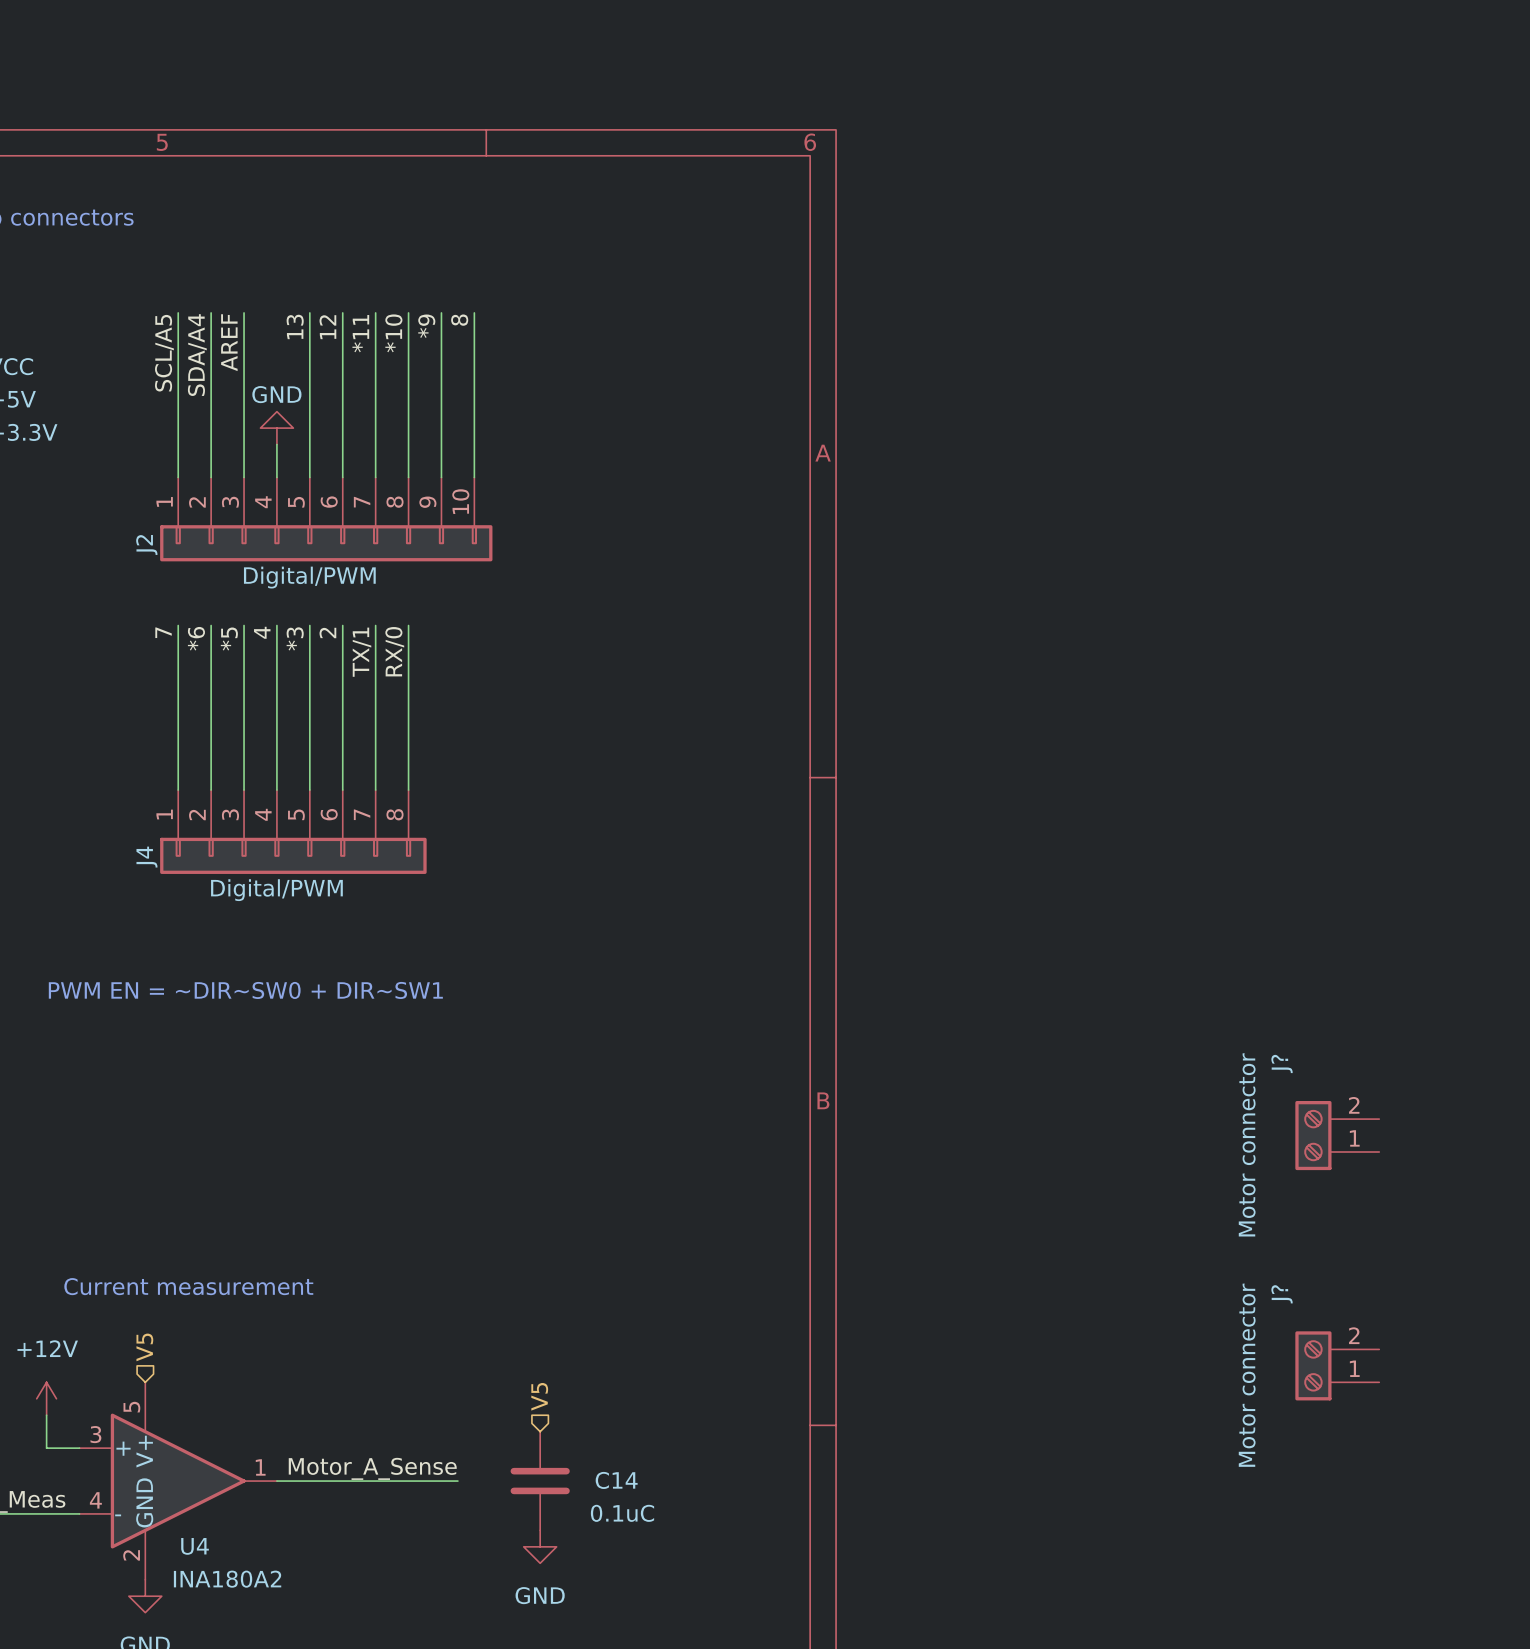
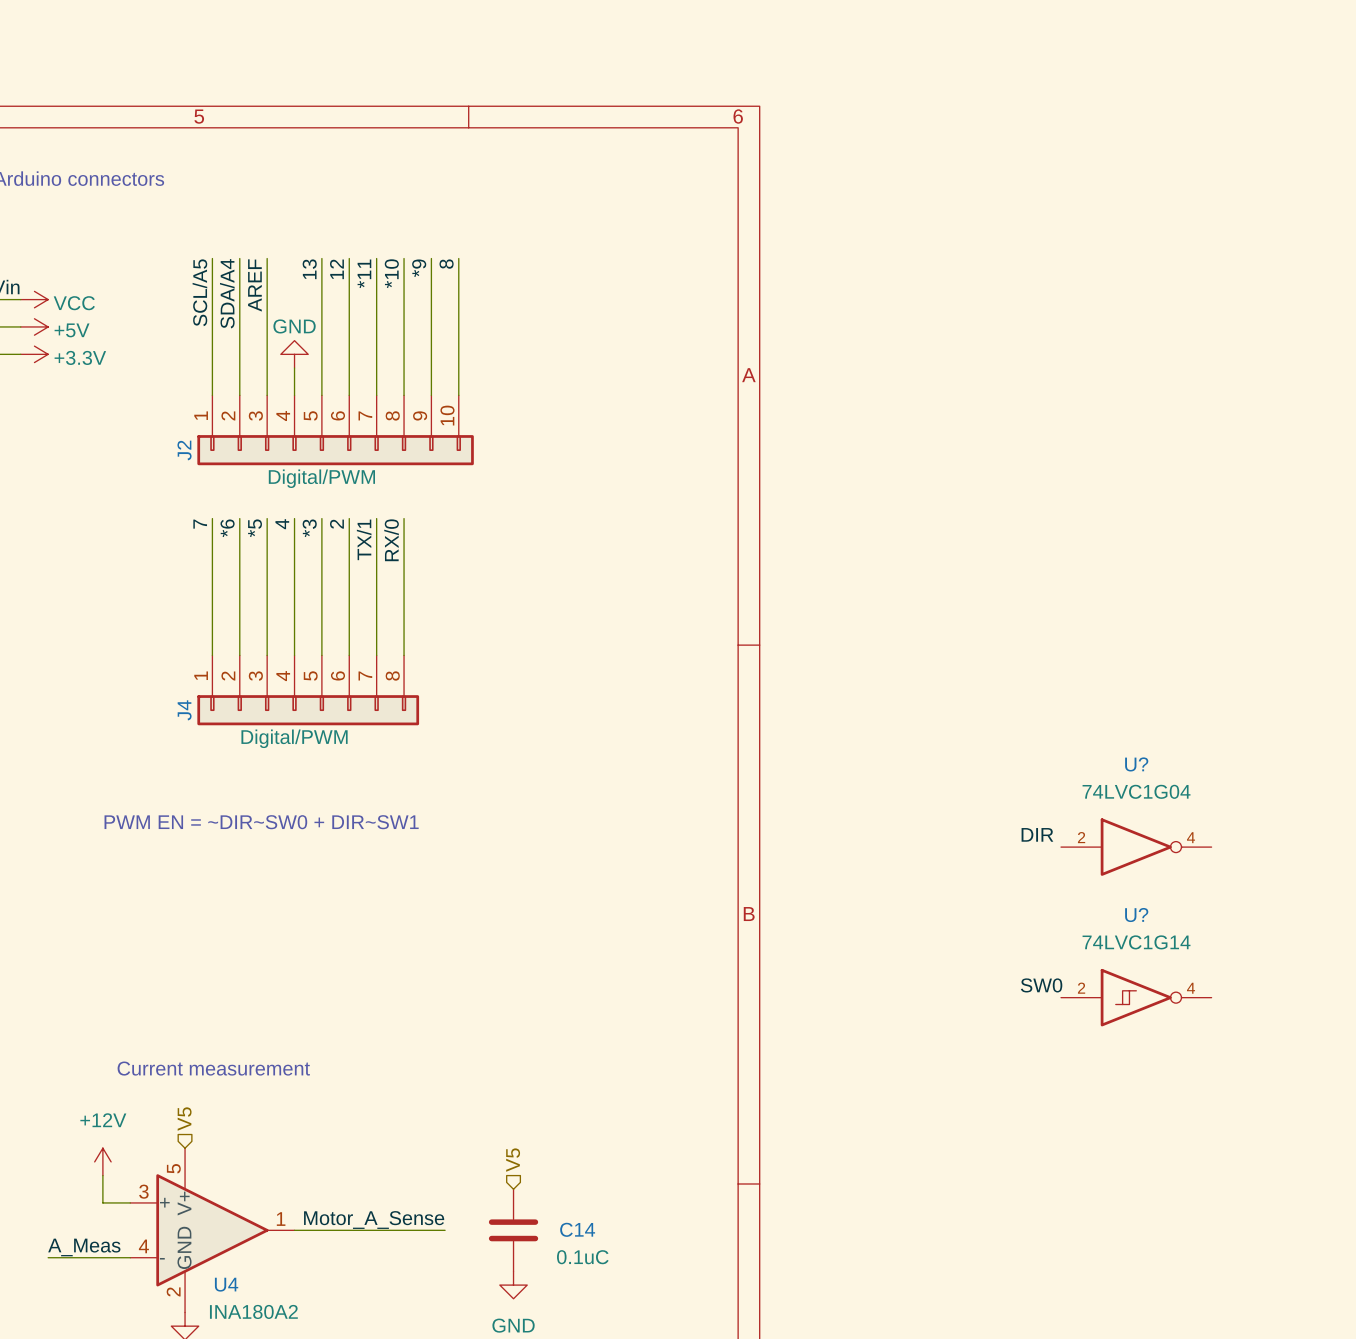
label: none -> DIR (1037, 834)
U?: none -> 74LVC1G04 (1136, 847)
J?: Motor connector (1337, 1135) -> none
label: none -> SW0 (1041, 985)
U?: none -> 74LVC1G14 (1136, 997)
J?: Motor connector (1337, 1365) -> none

